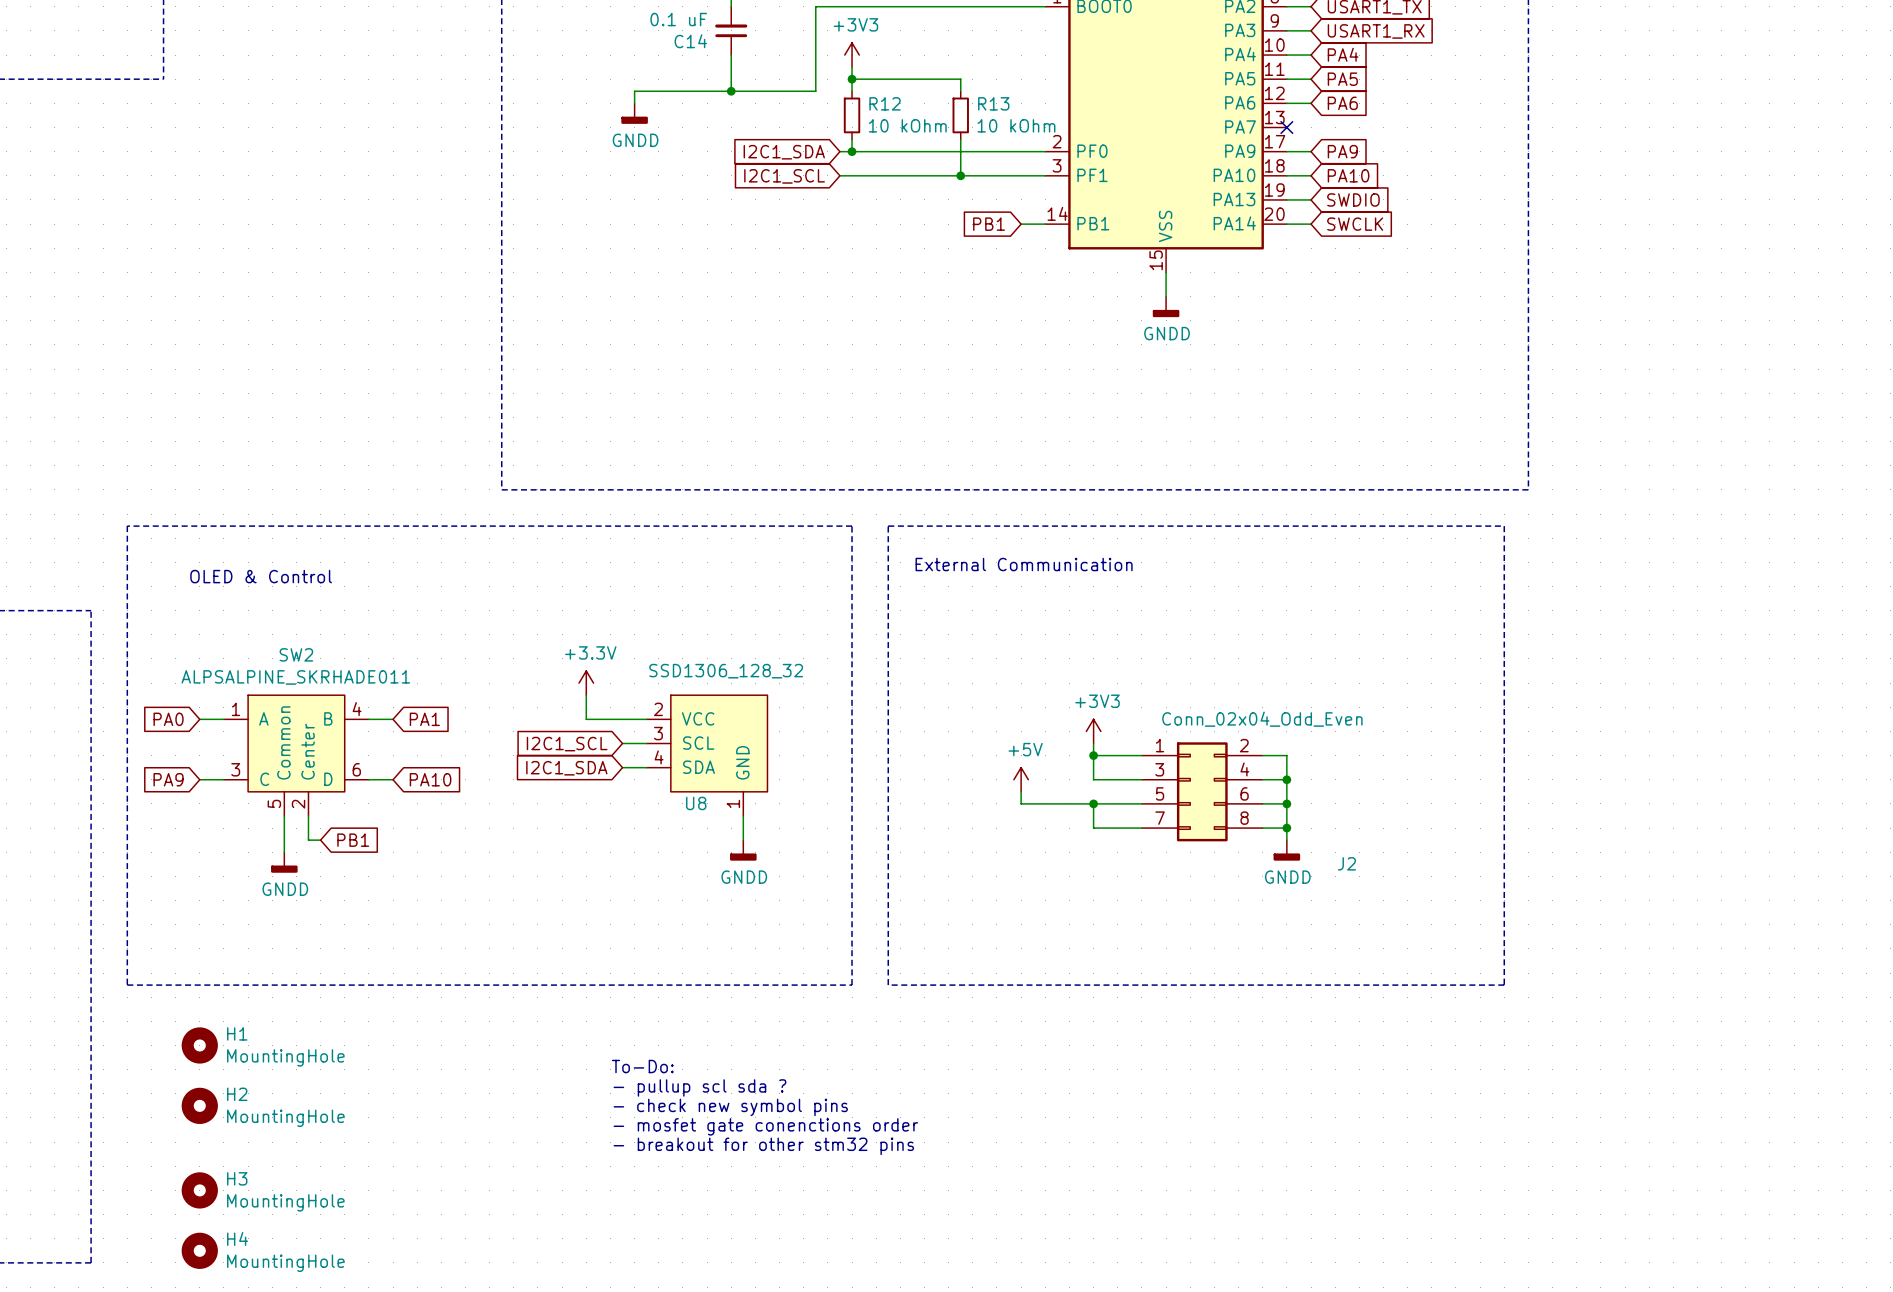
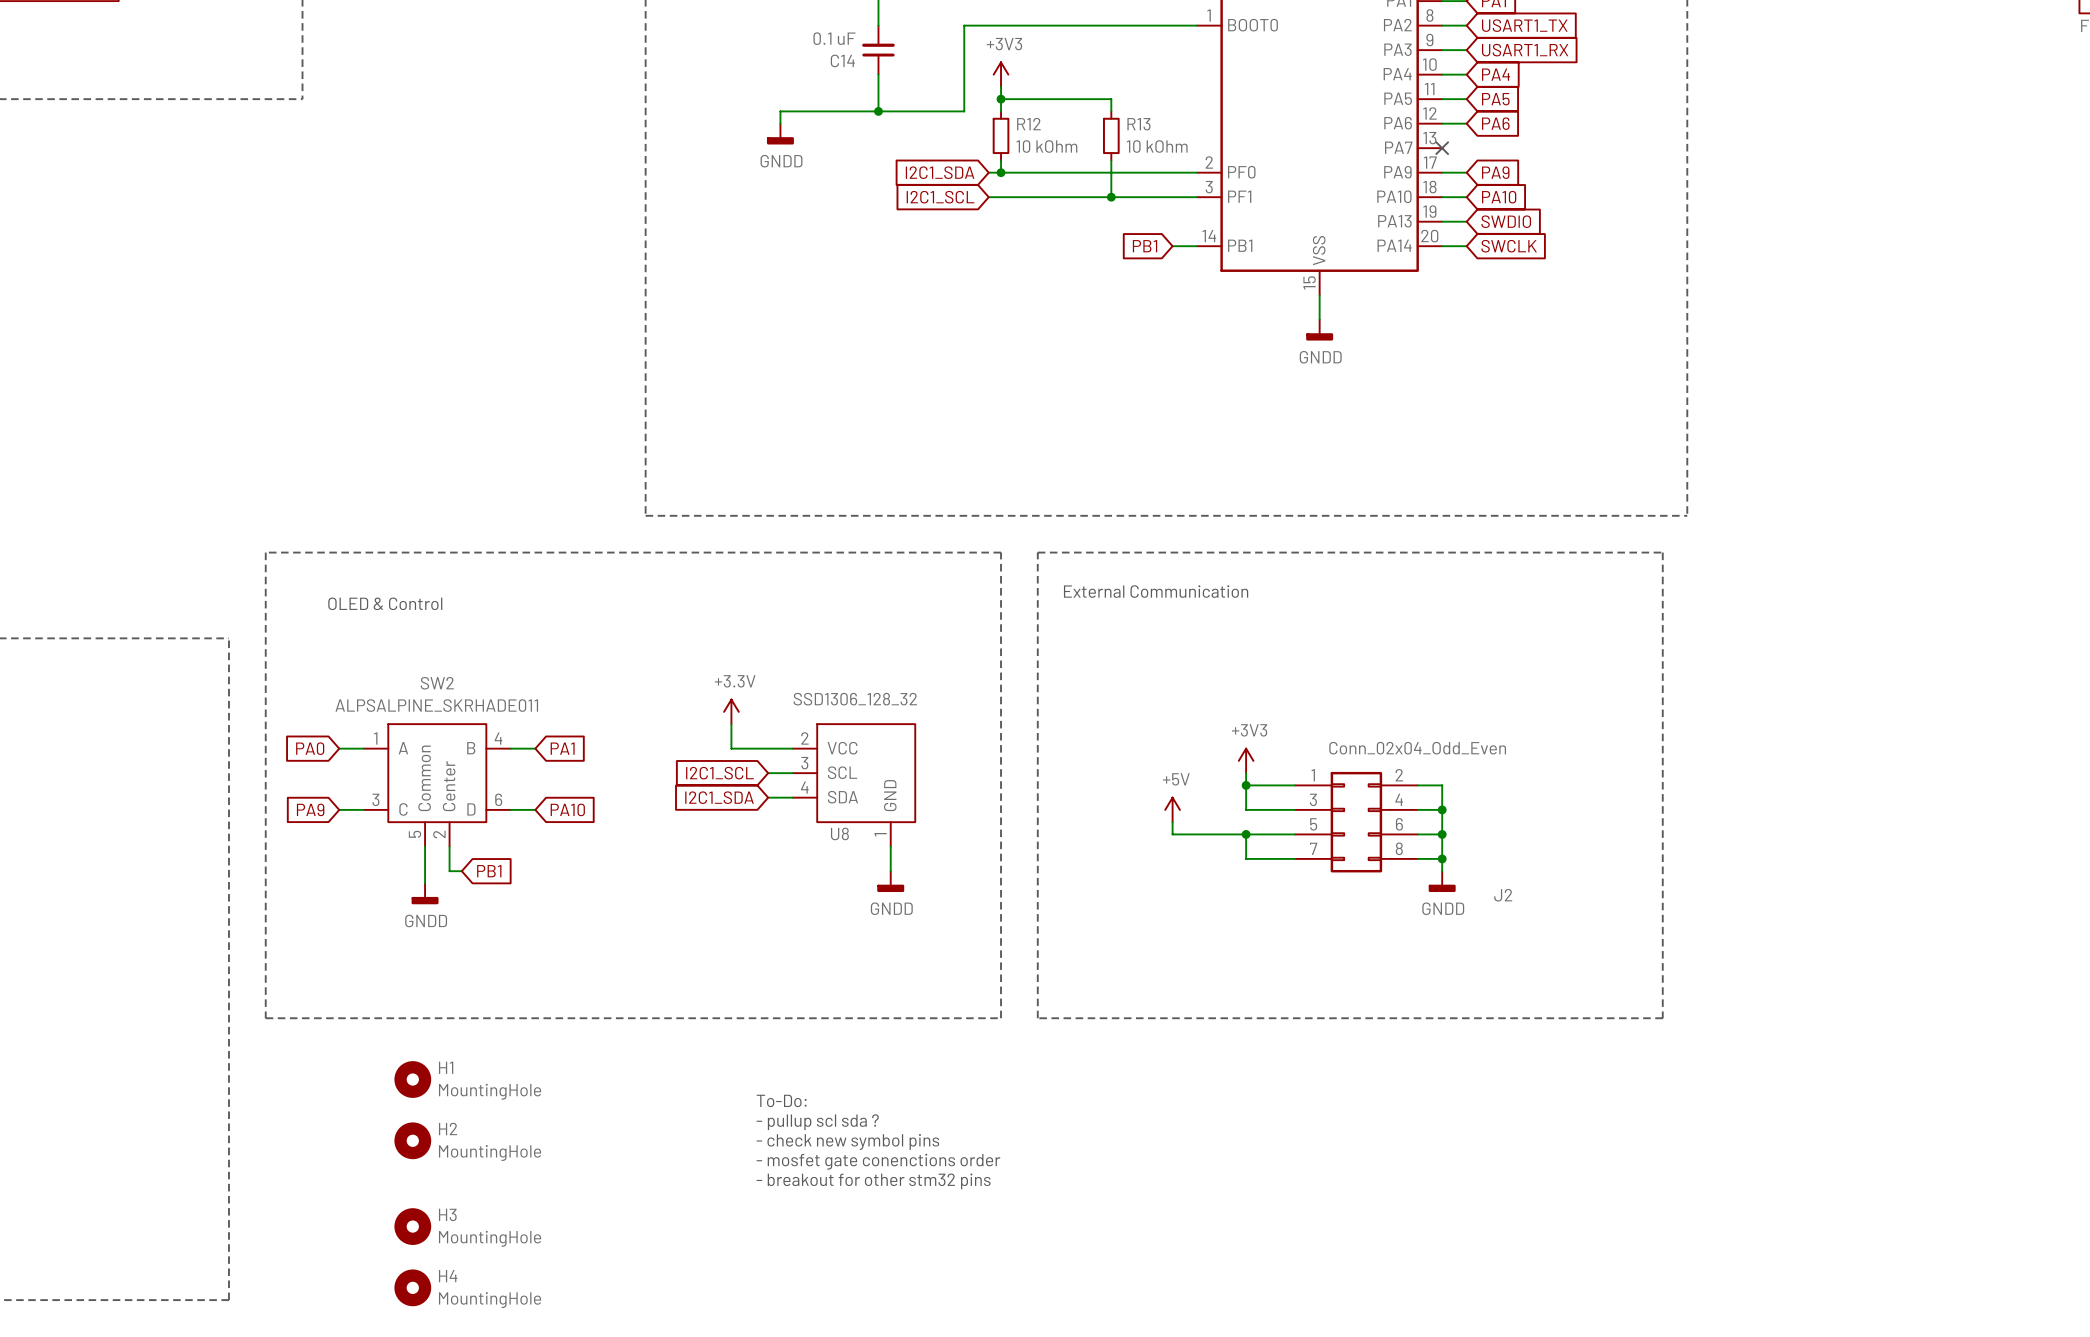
H1 position: (199, 1045) -> (412, 1079)
H2 position: (199, 1105) -> (412, 1140)
H3 position: (199, 1190) -> (412, 1226)
H4 position: (199, 1250) -> (412, 1287)

